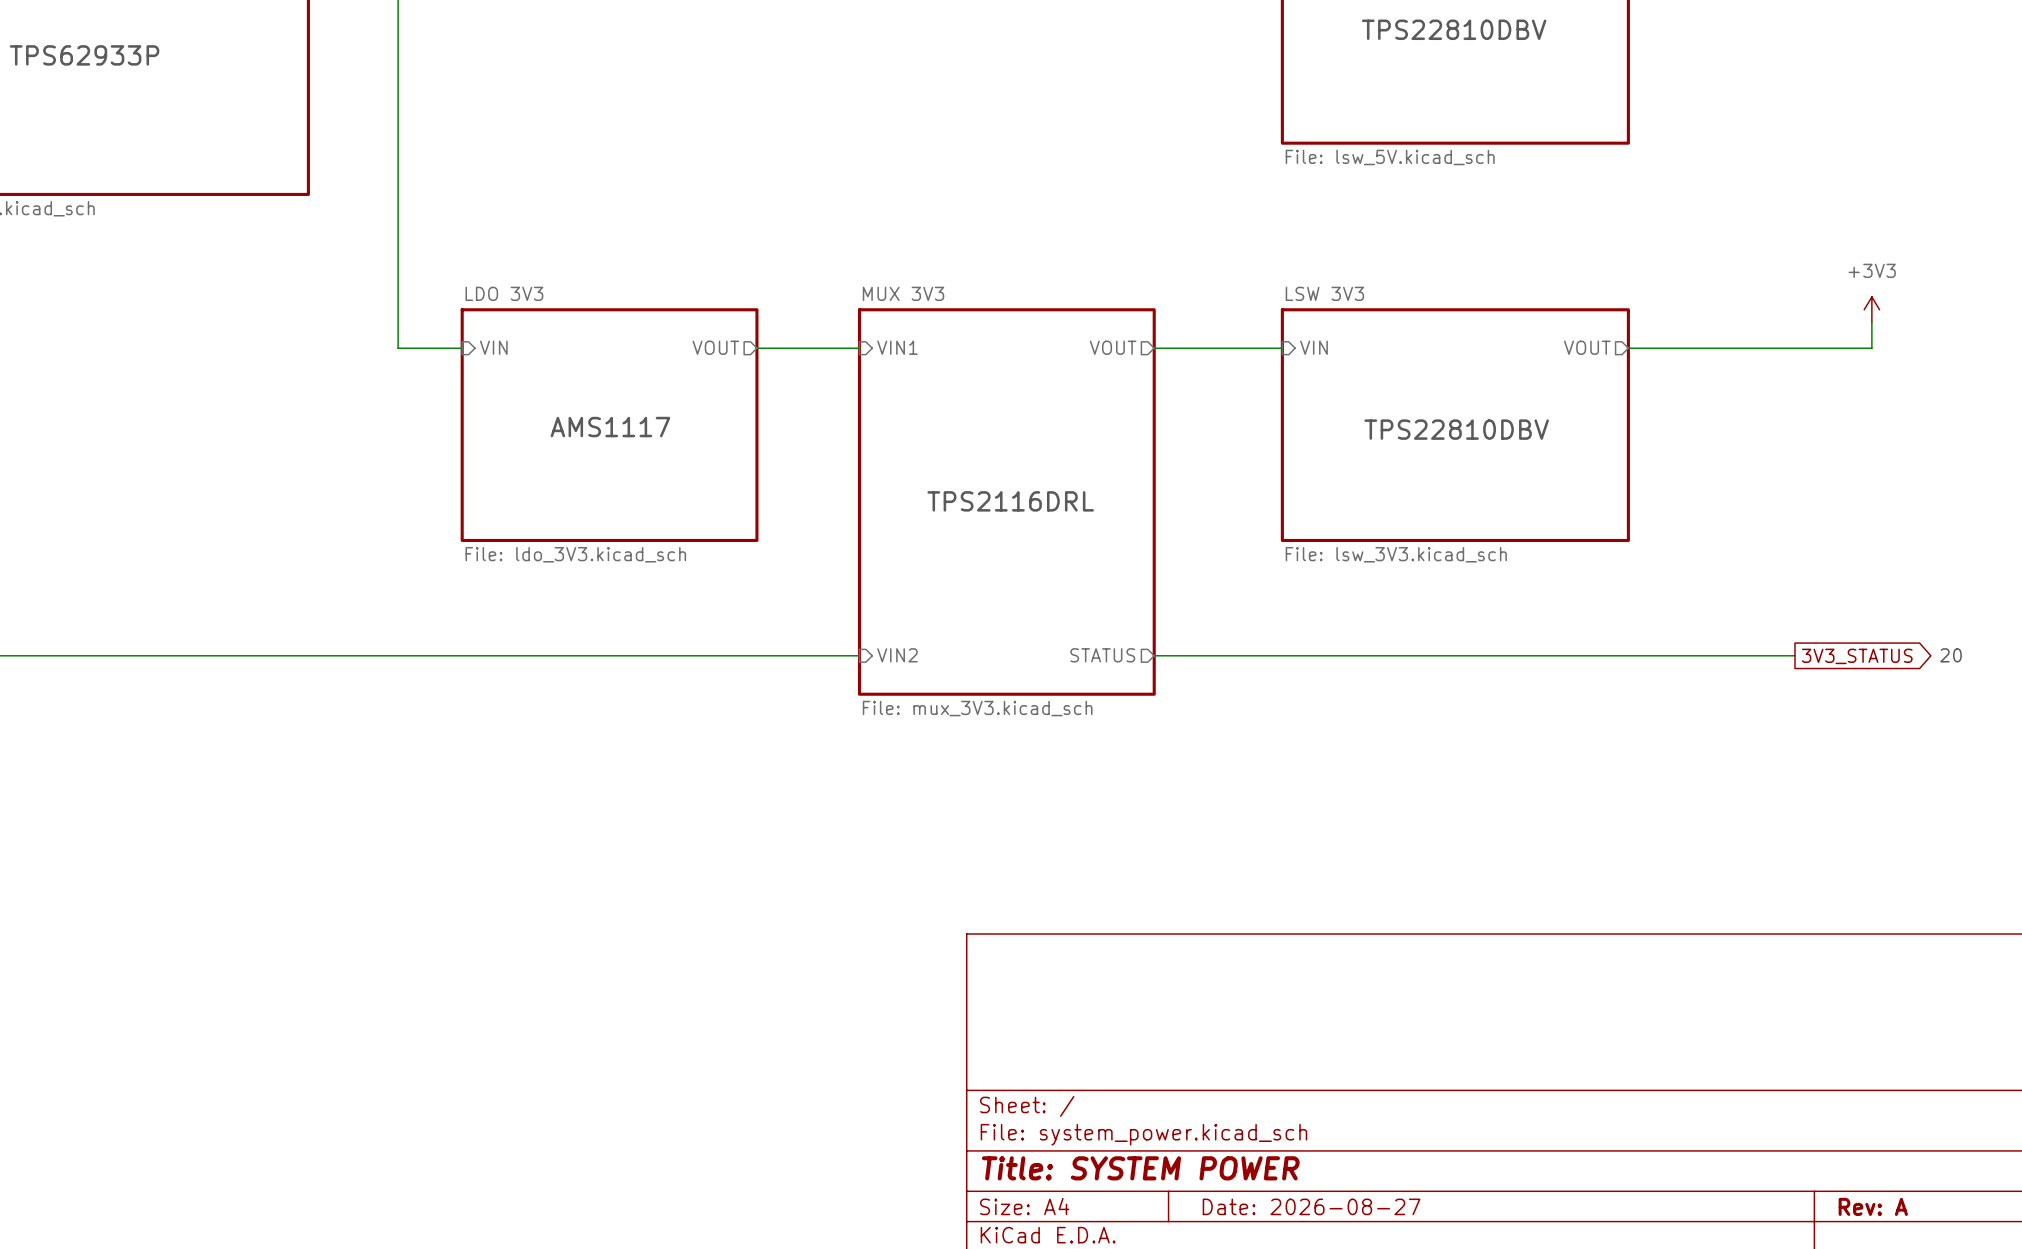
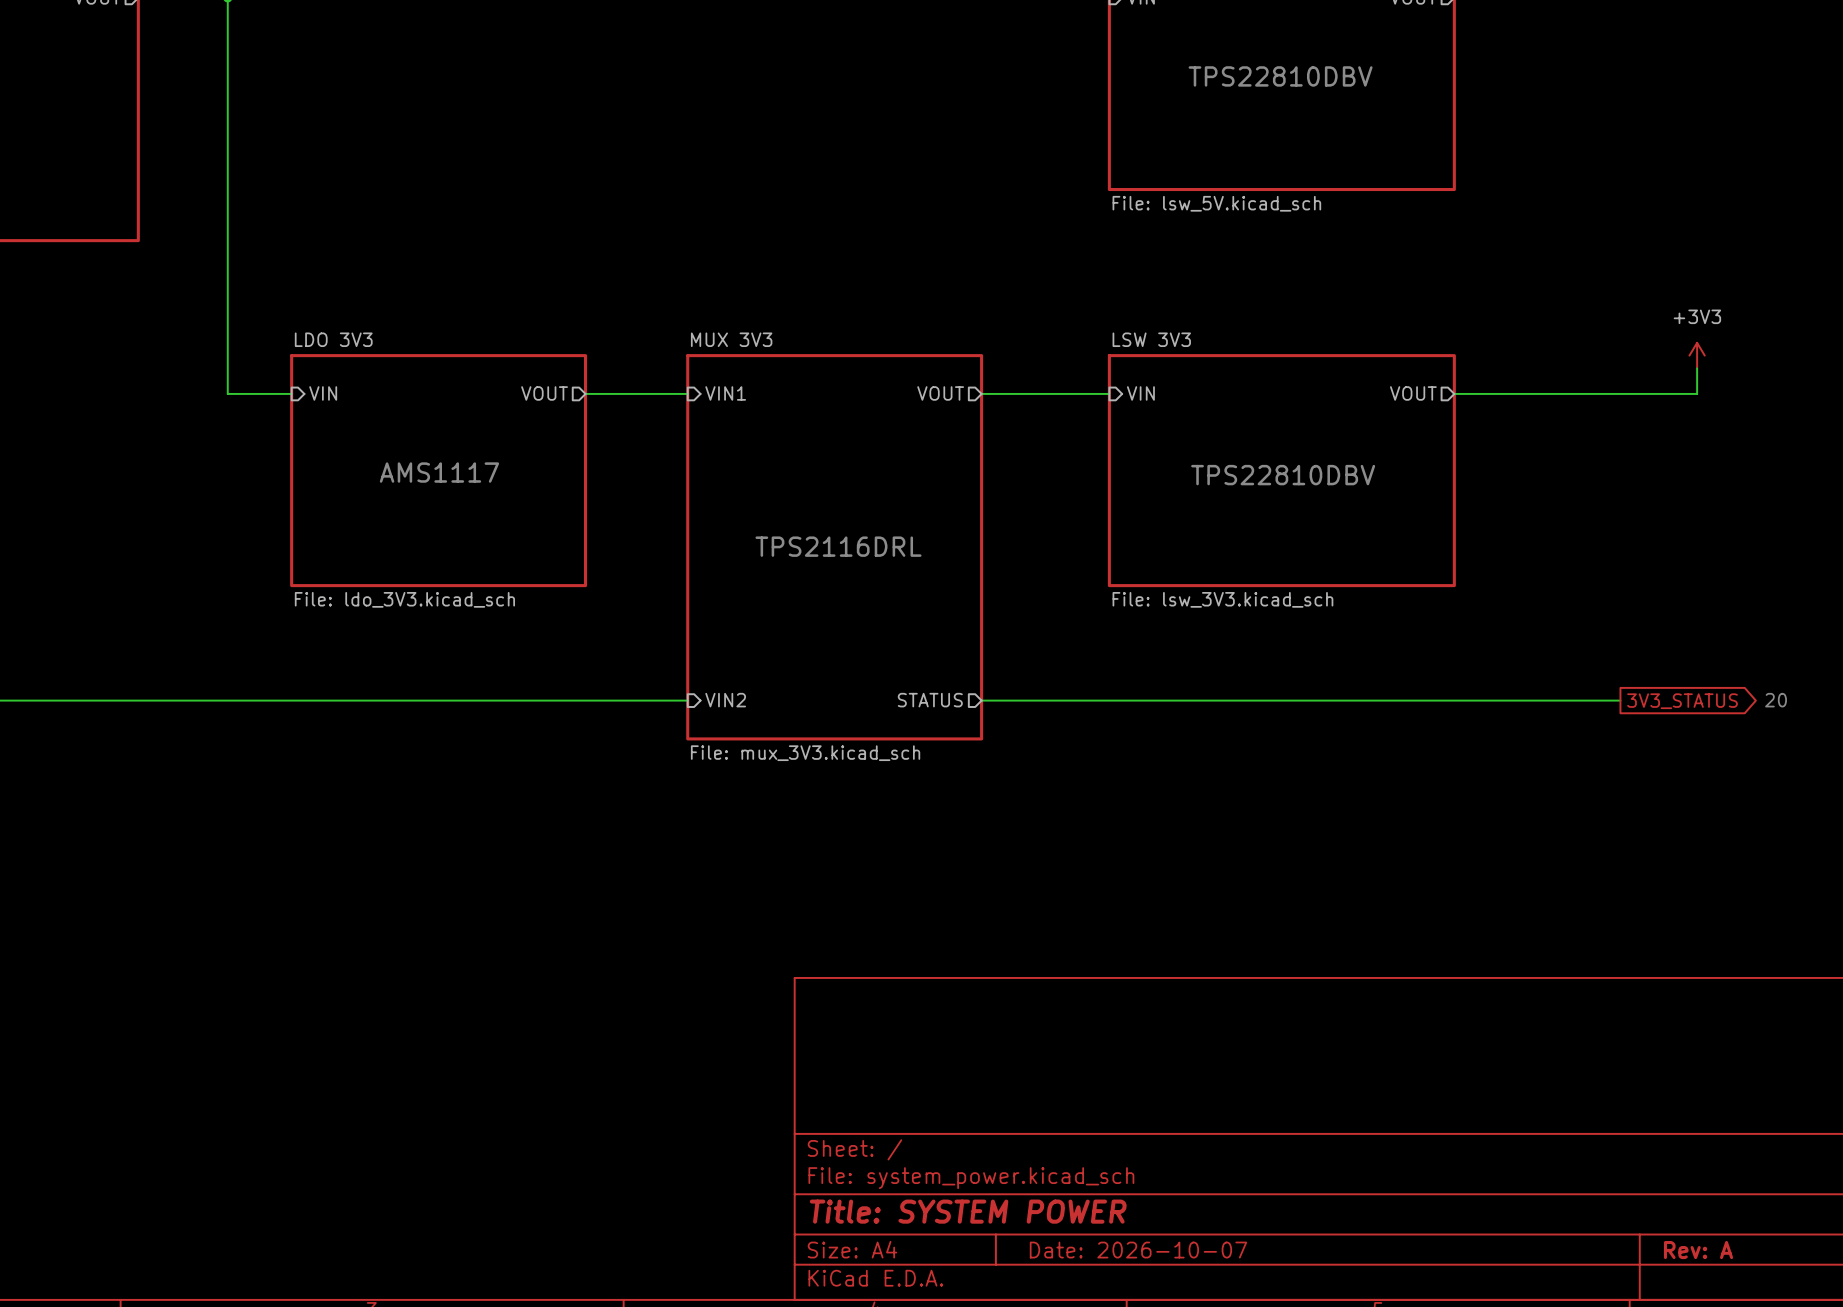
title block: Date: 2026-08-27 (1311, 1206) -> Date: 2026-10-07 (1138, 1250)

